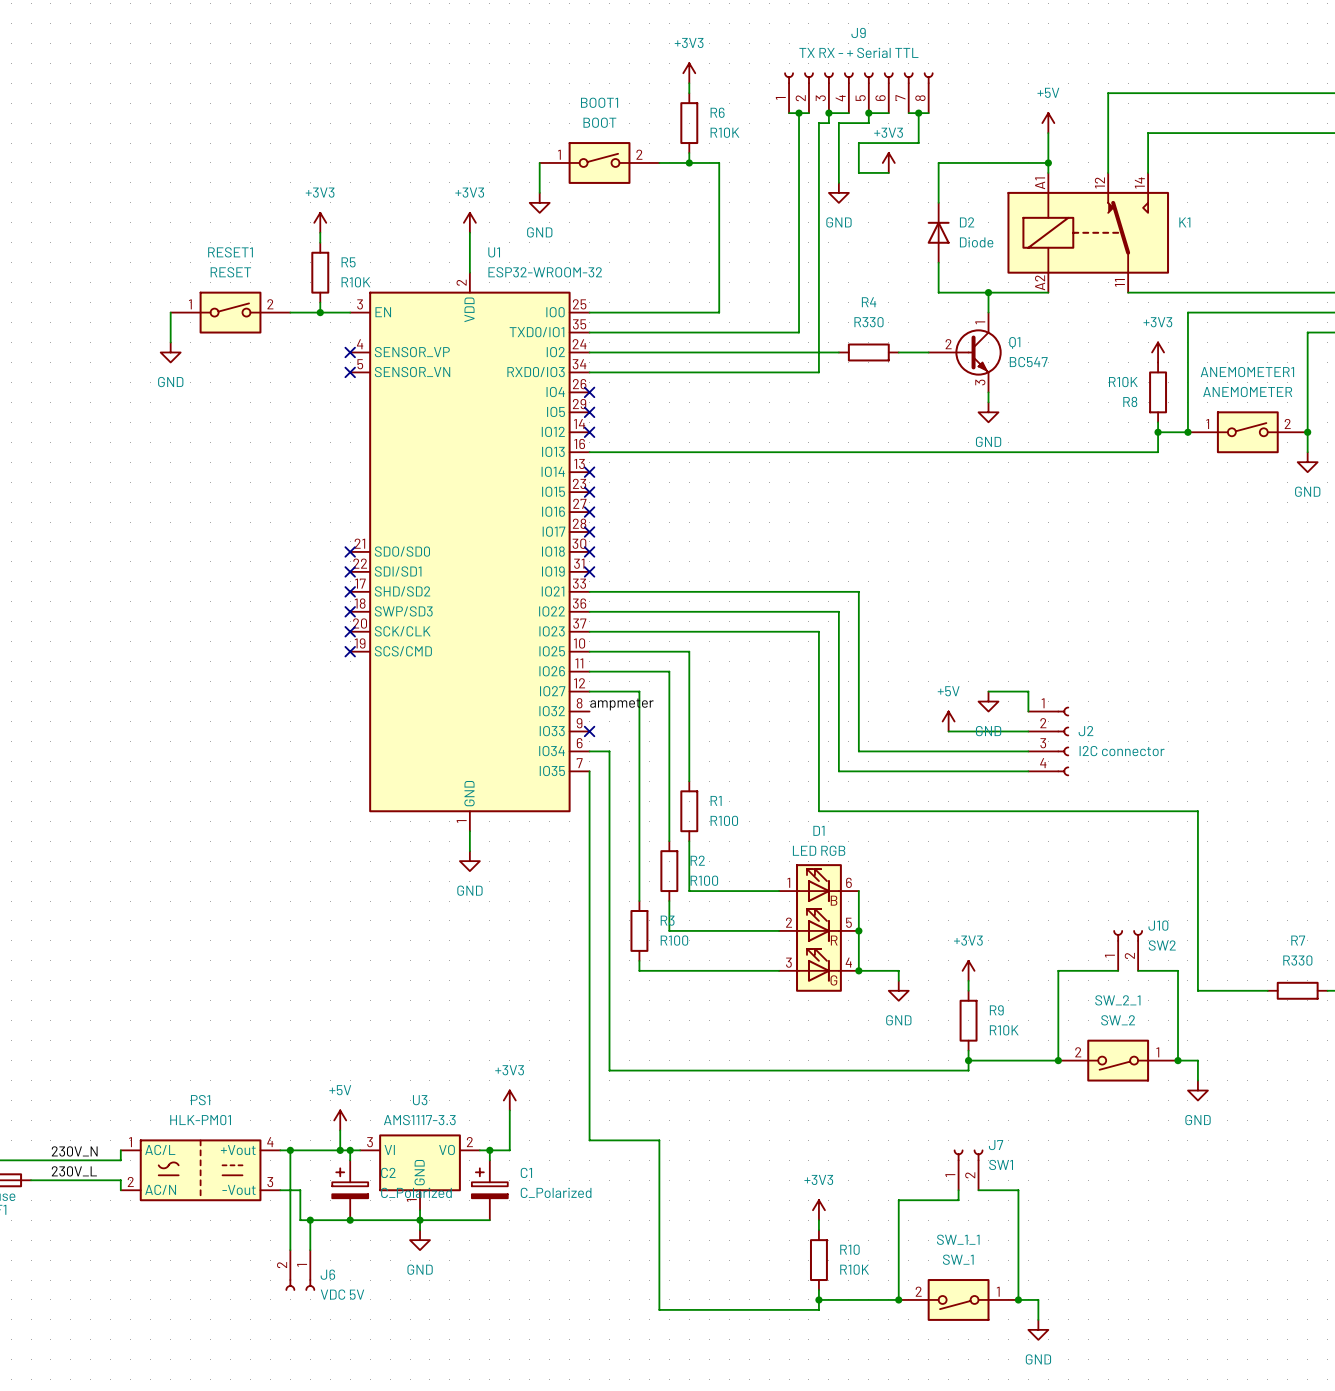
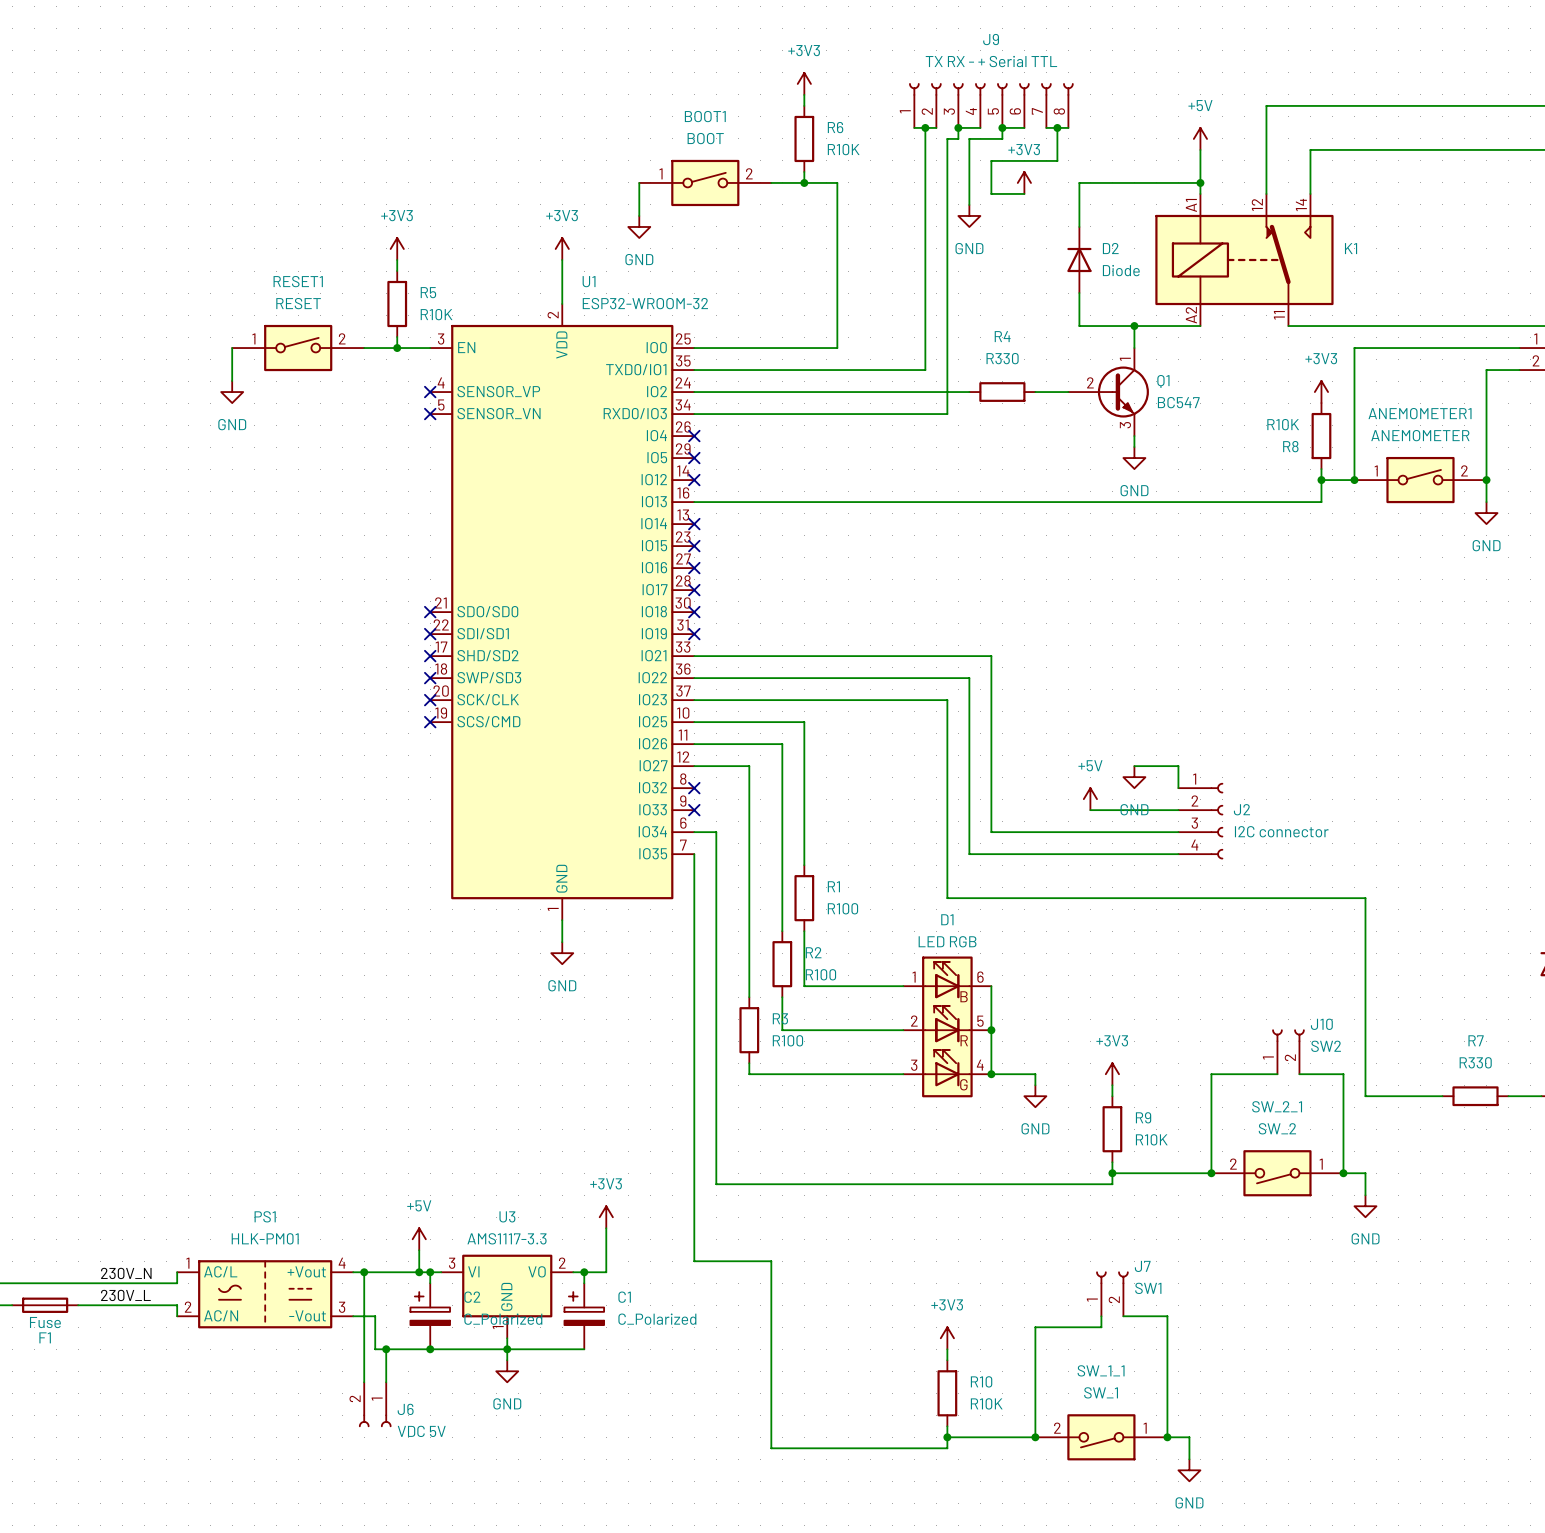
label: ampmeter (621, 704) -> none
no-connect mark: none -> (694, 788)

